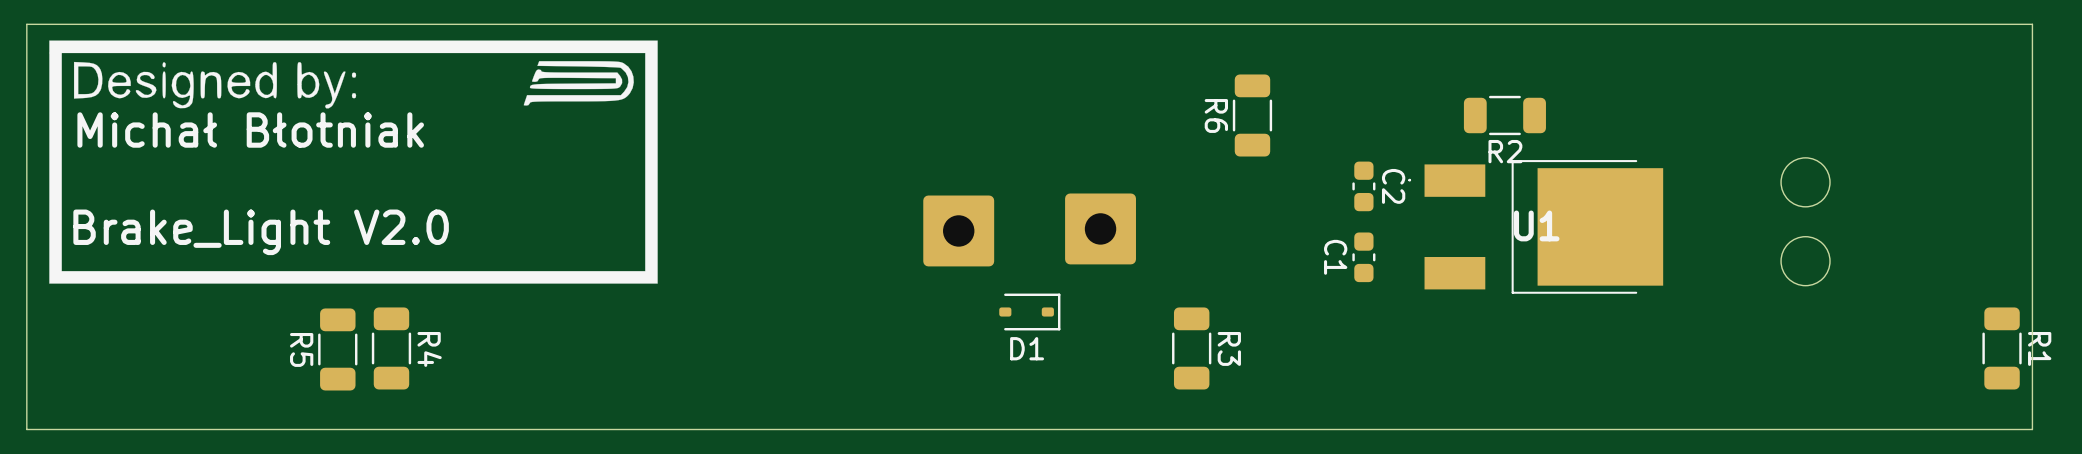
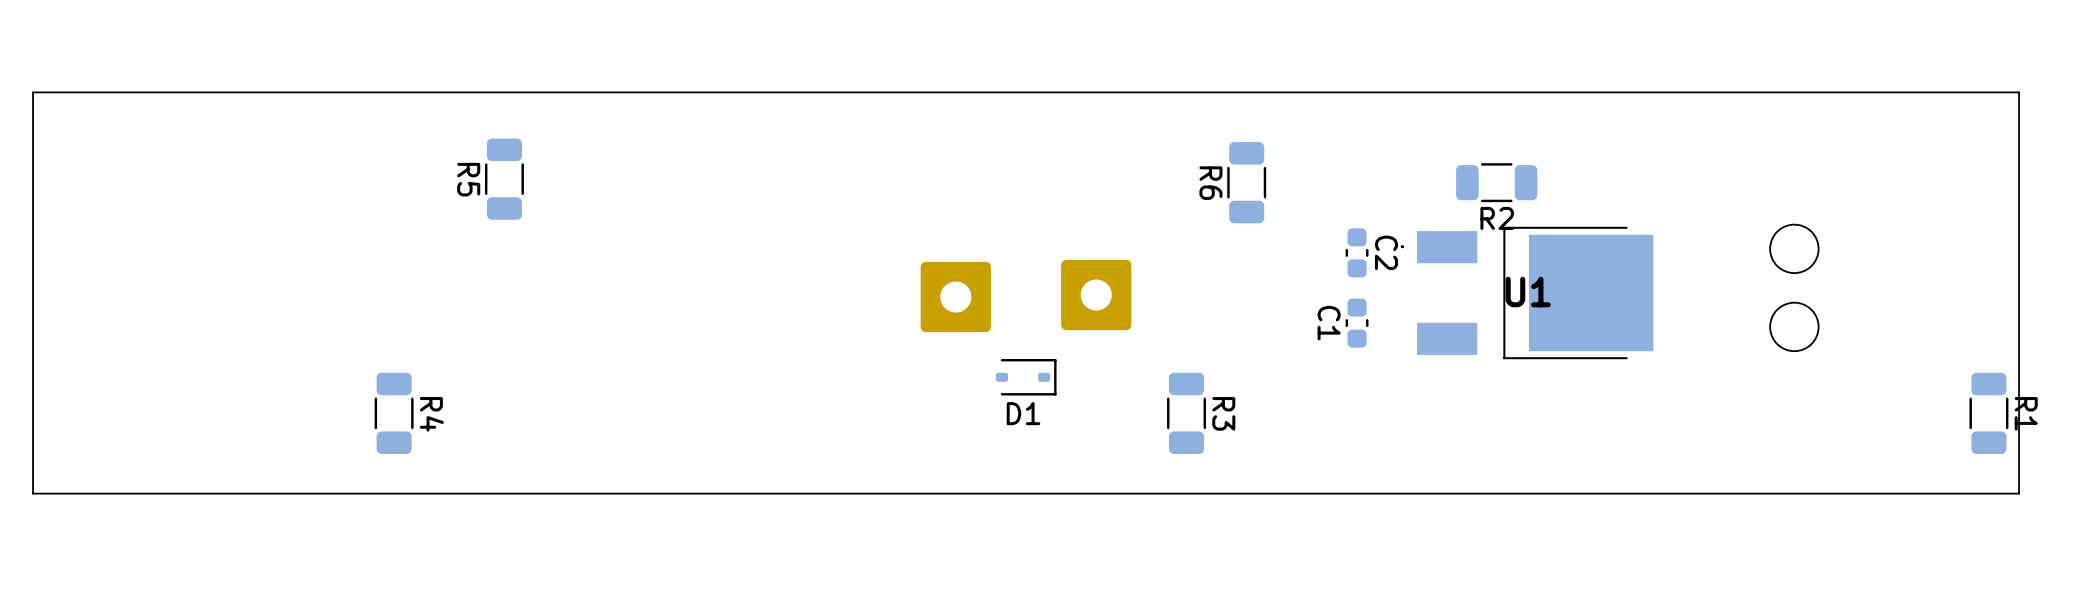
drawing: [49, 40, 658, 284] -> none
text: Michał Błotniak (250, 130) -> none
text: Brake_Light V2.0 (261, 232) -> none
R5 position: (337, 349) -> (504, 179)

